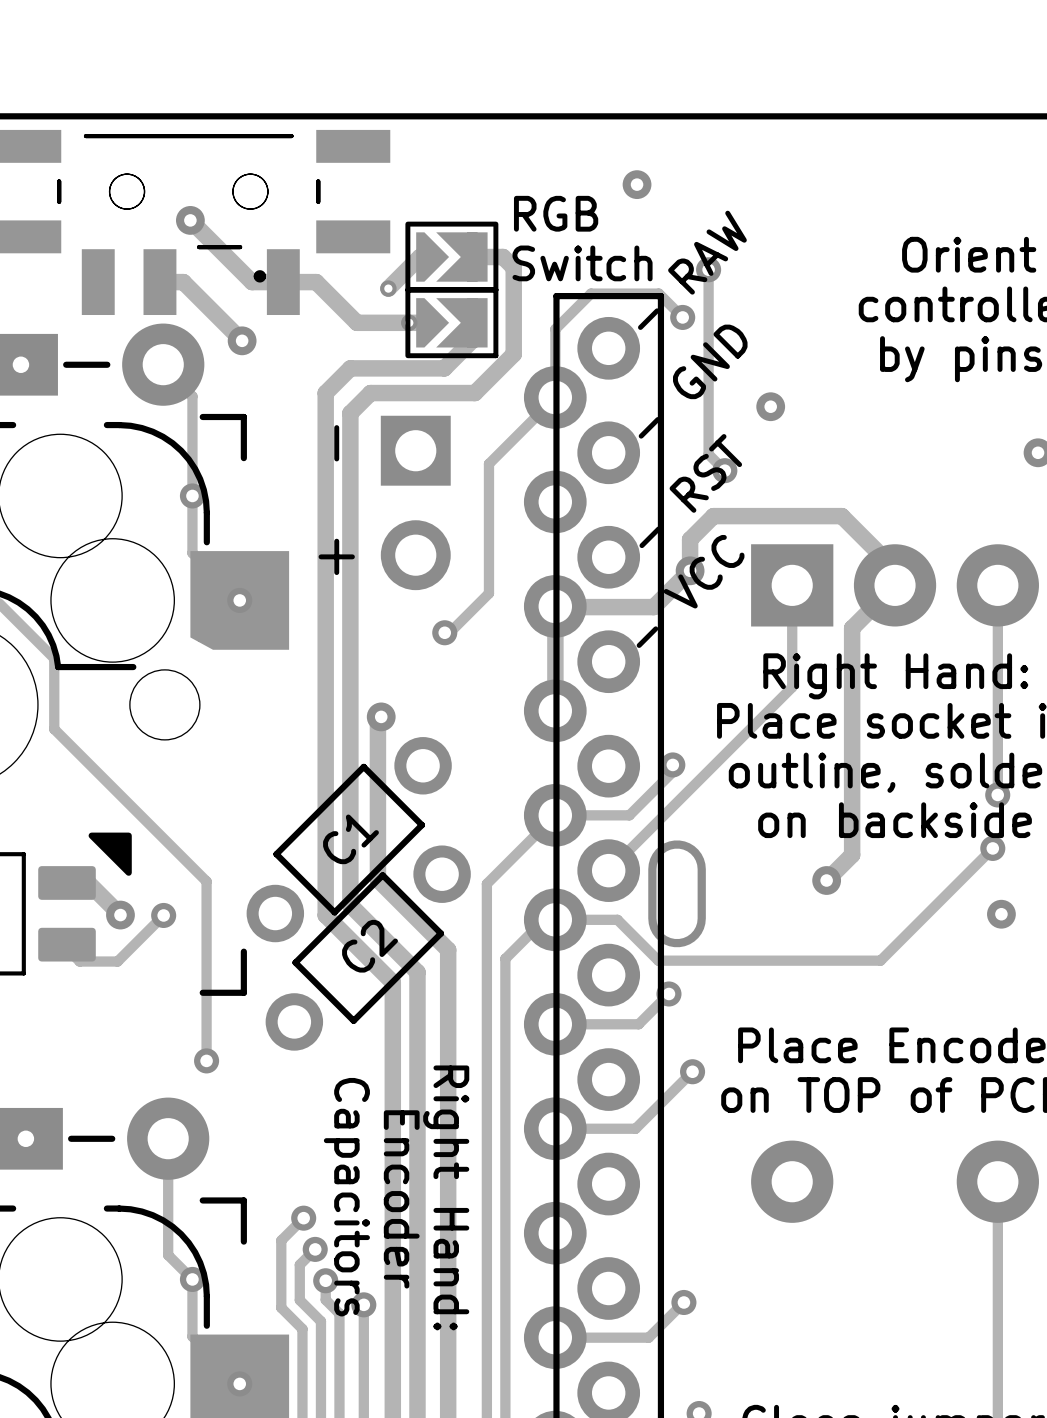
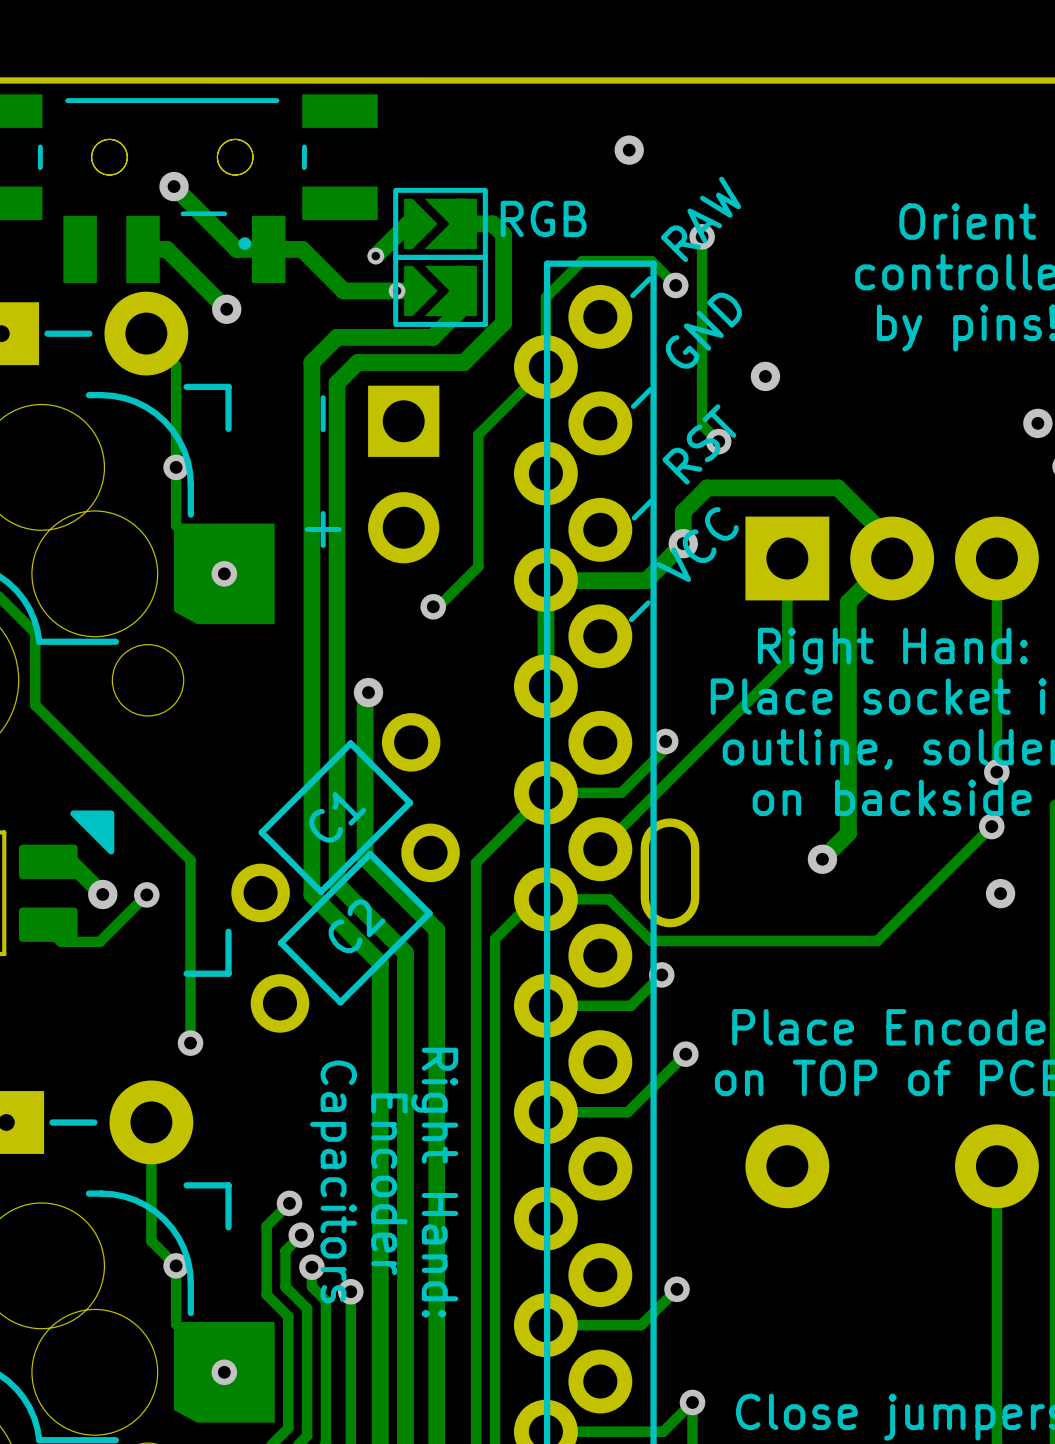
text position: RGB (556, 213) -> RGB (543, 218)
text: Switch (582, 263) -> none

